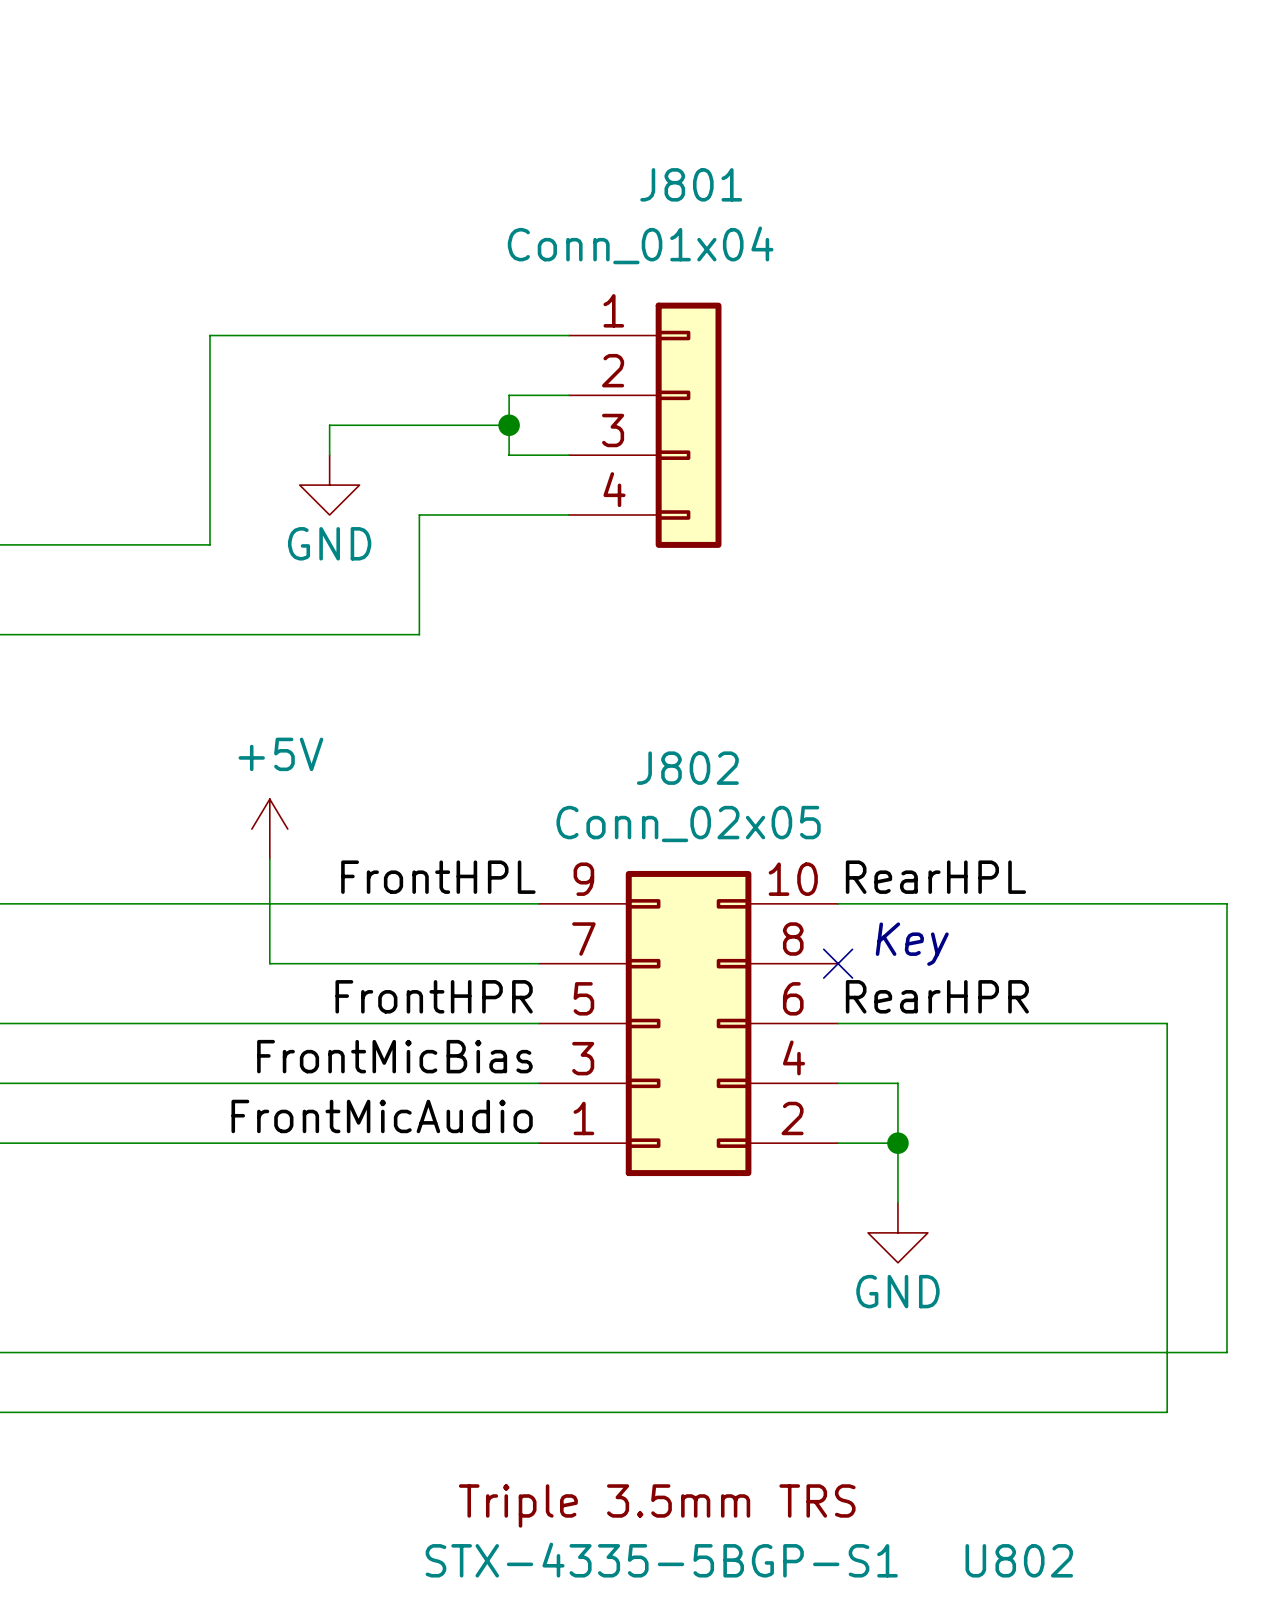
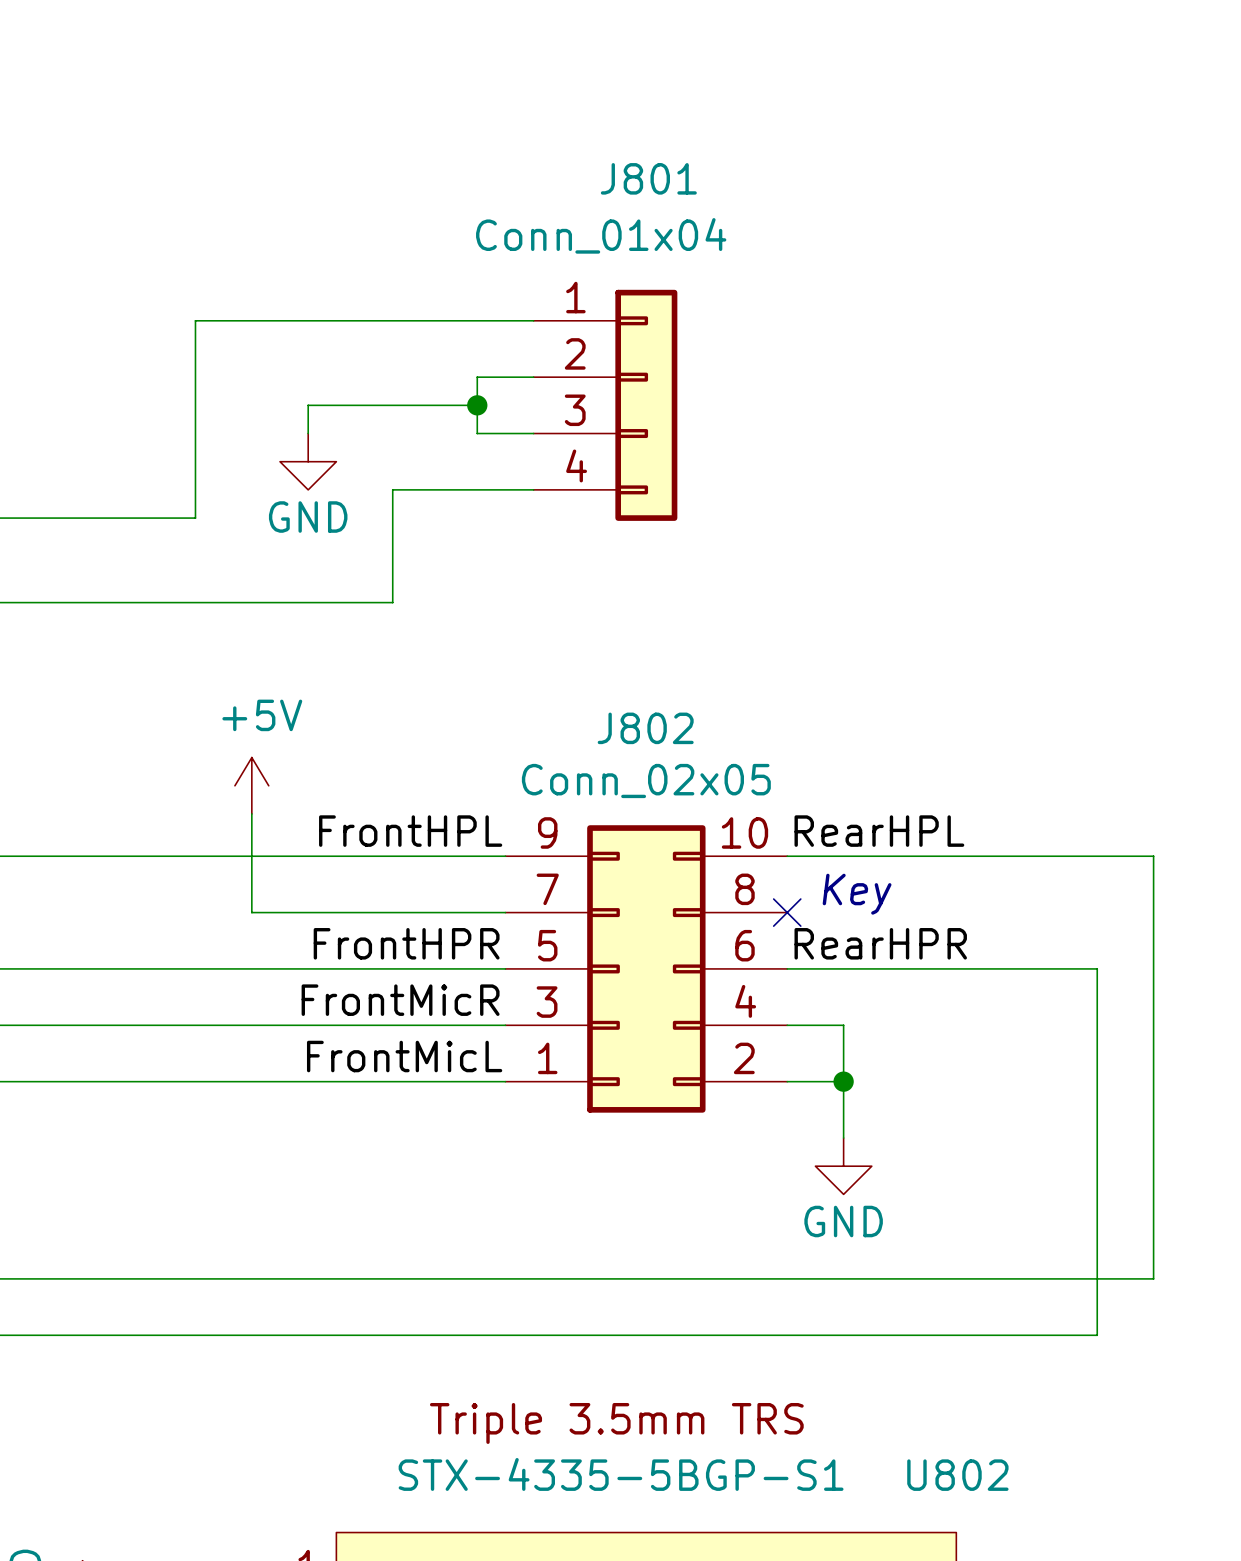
label: FrontMicBias (394, 1056) -> FrontMicR (400, 1000)
label: FrontMicAudio (382, 1116) -> FrontMicL (404, 1056)

